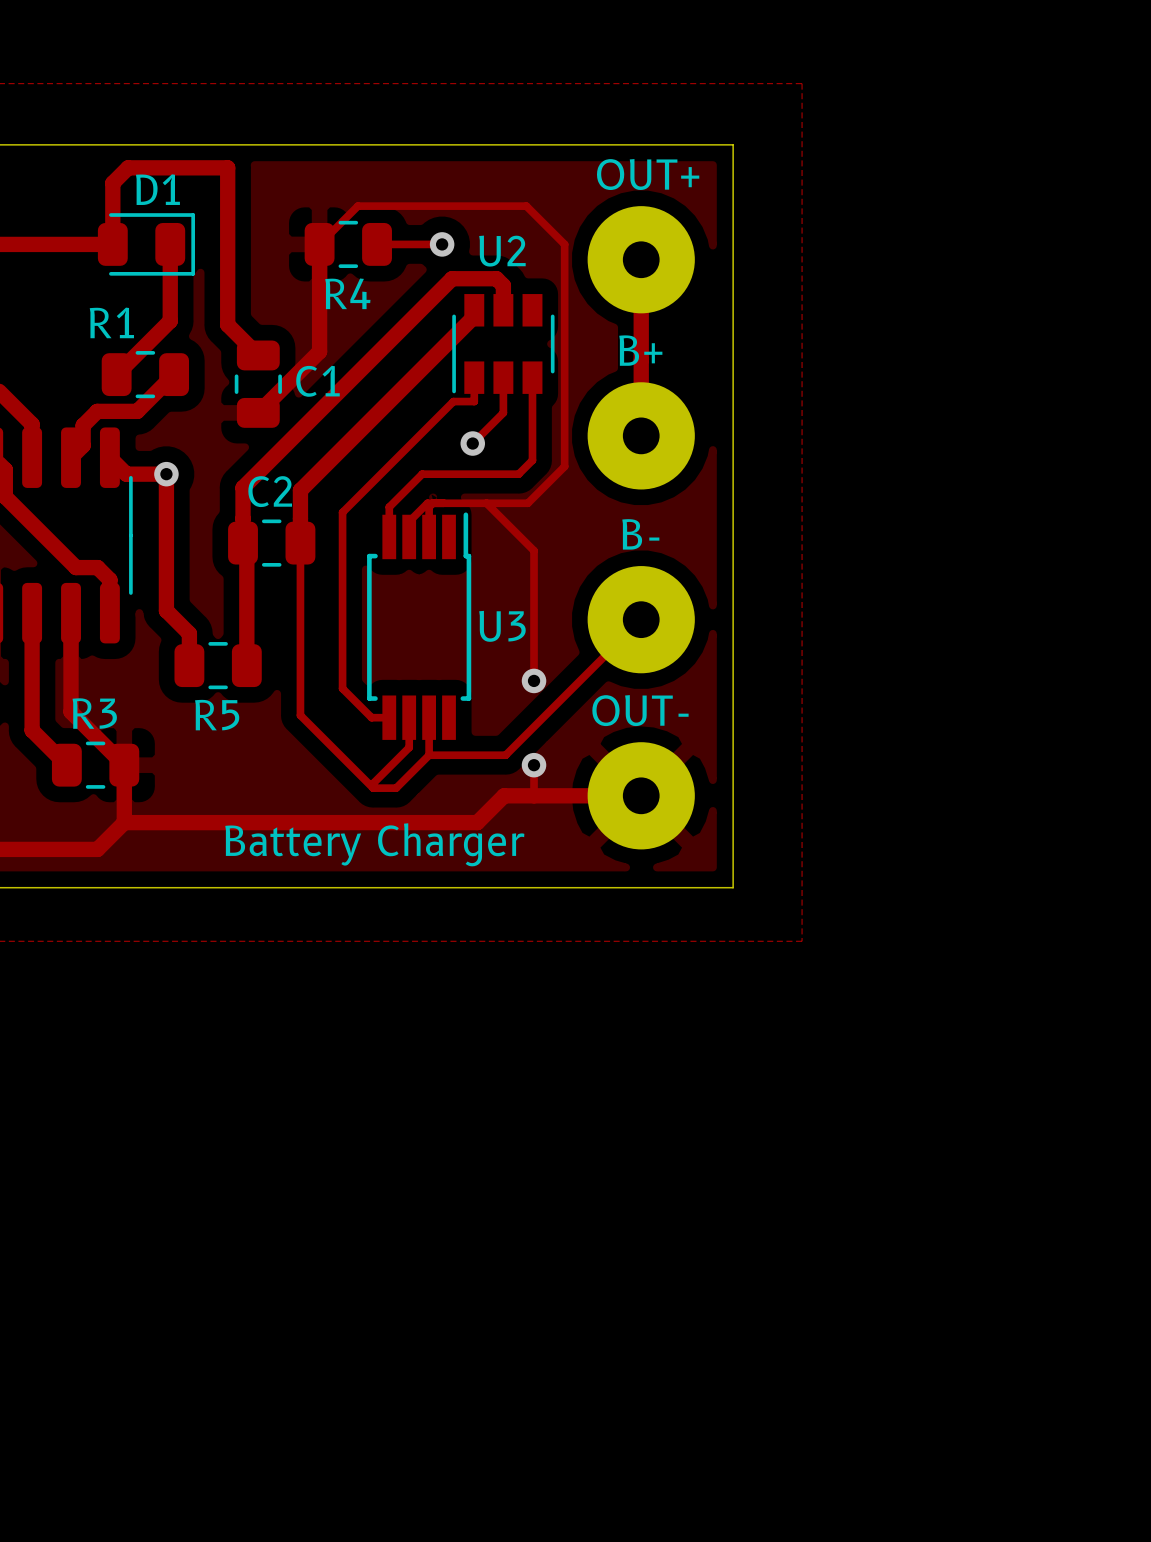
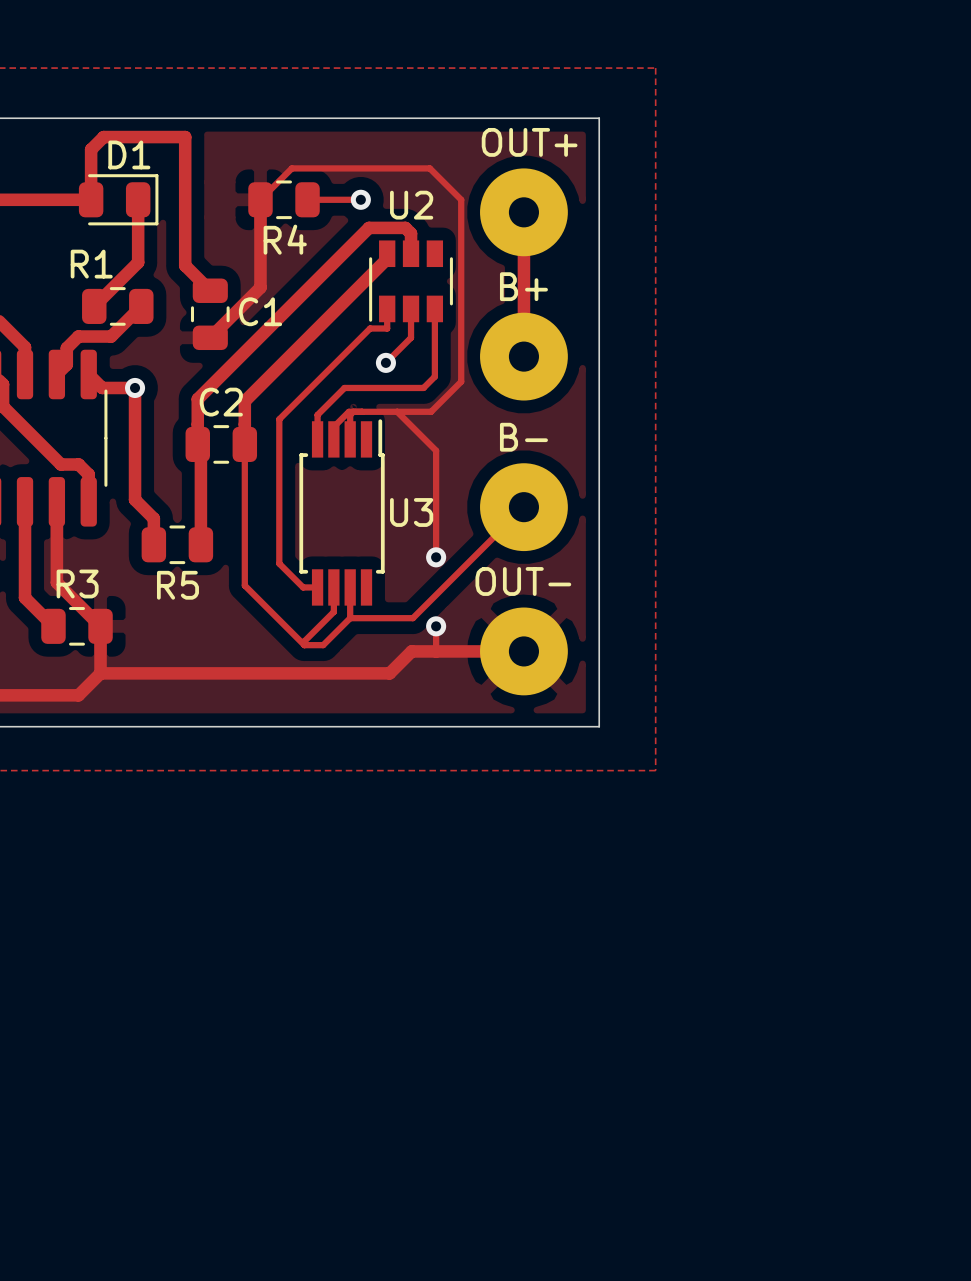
text: Battery Charger (374, 844) -> none

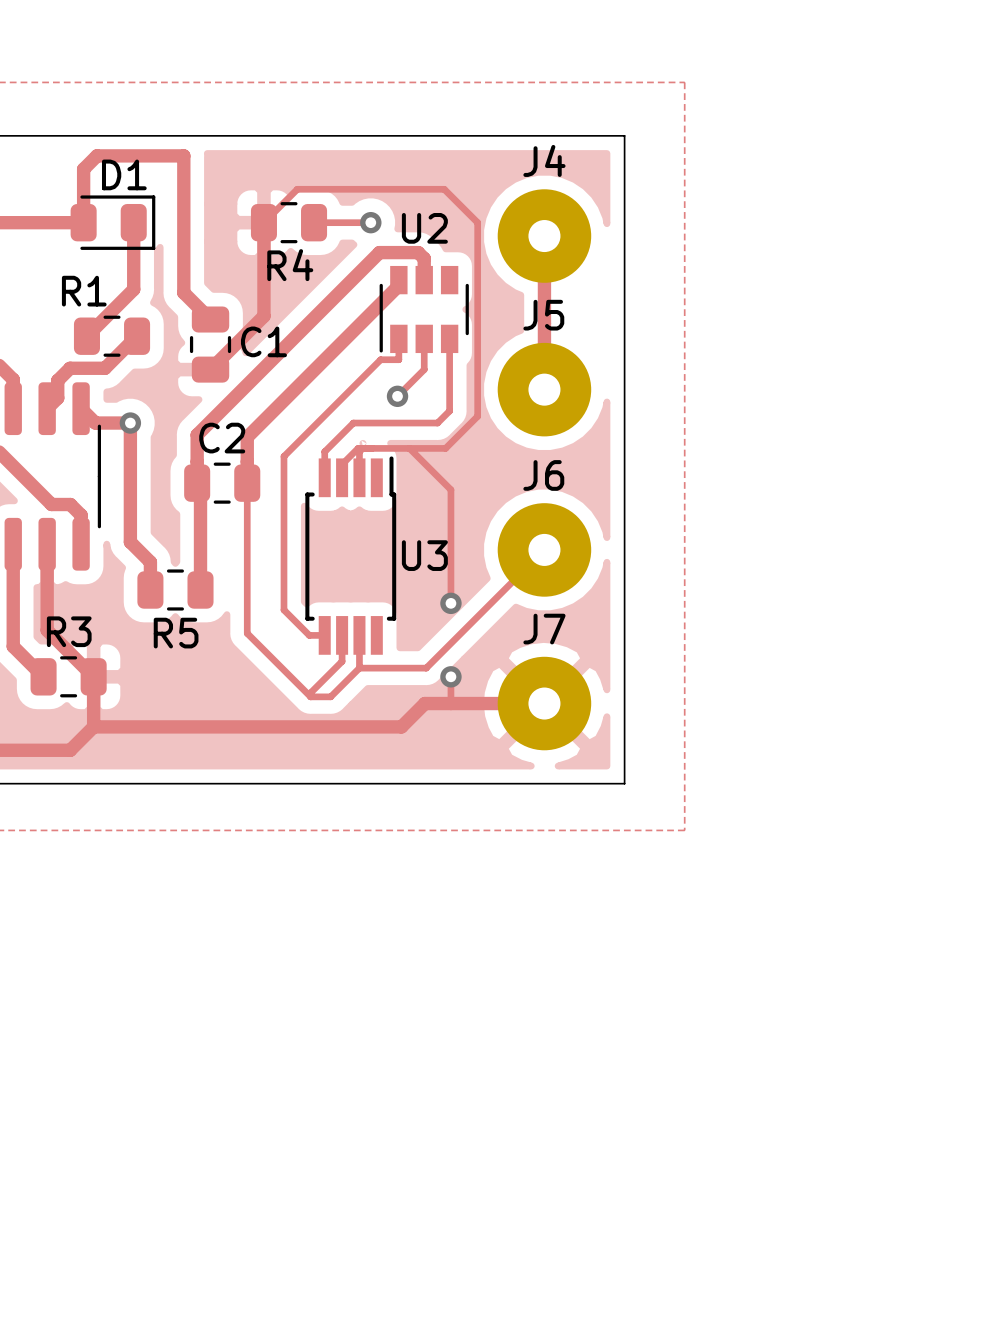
OUT+ name: OUT+ (529, 142) -> J4 (544, 160)
B+ name: B+ (523, 286) -> J5 (543, 315)
B- name: B- (523, 437) -> J6 (543, 475)
OUT- name: OUT- (523, 581) -> J7 (544, 629)

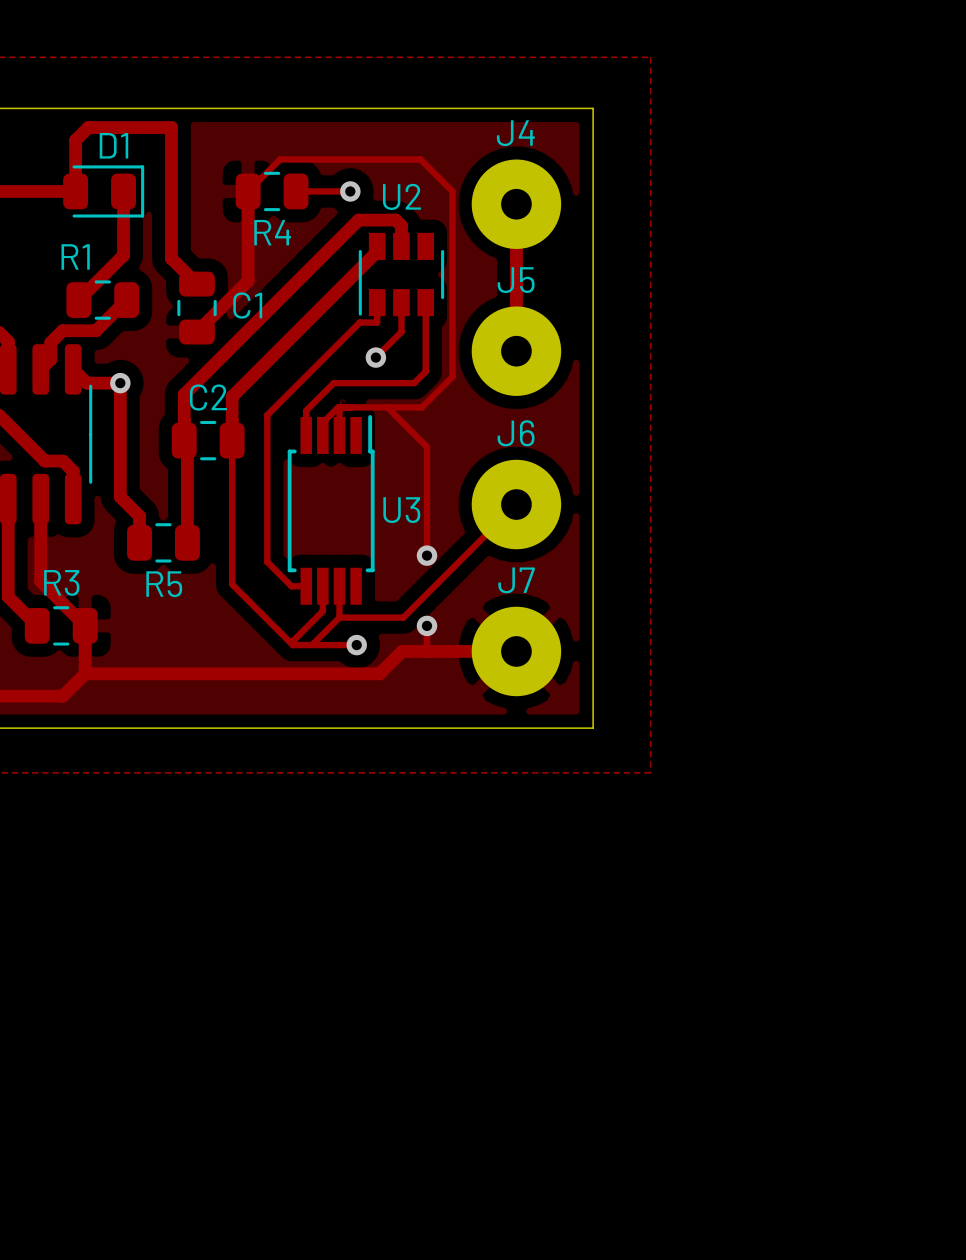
track: none -> (312, 645) (356, 645)
via: none -> (356, 645)

